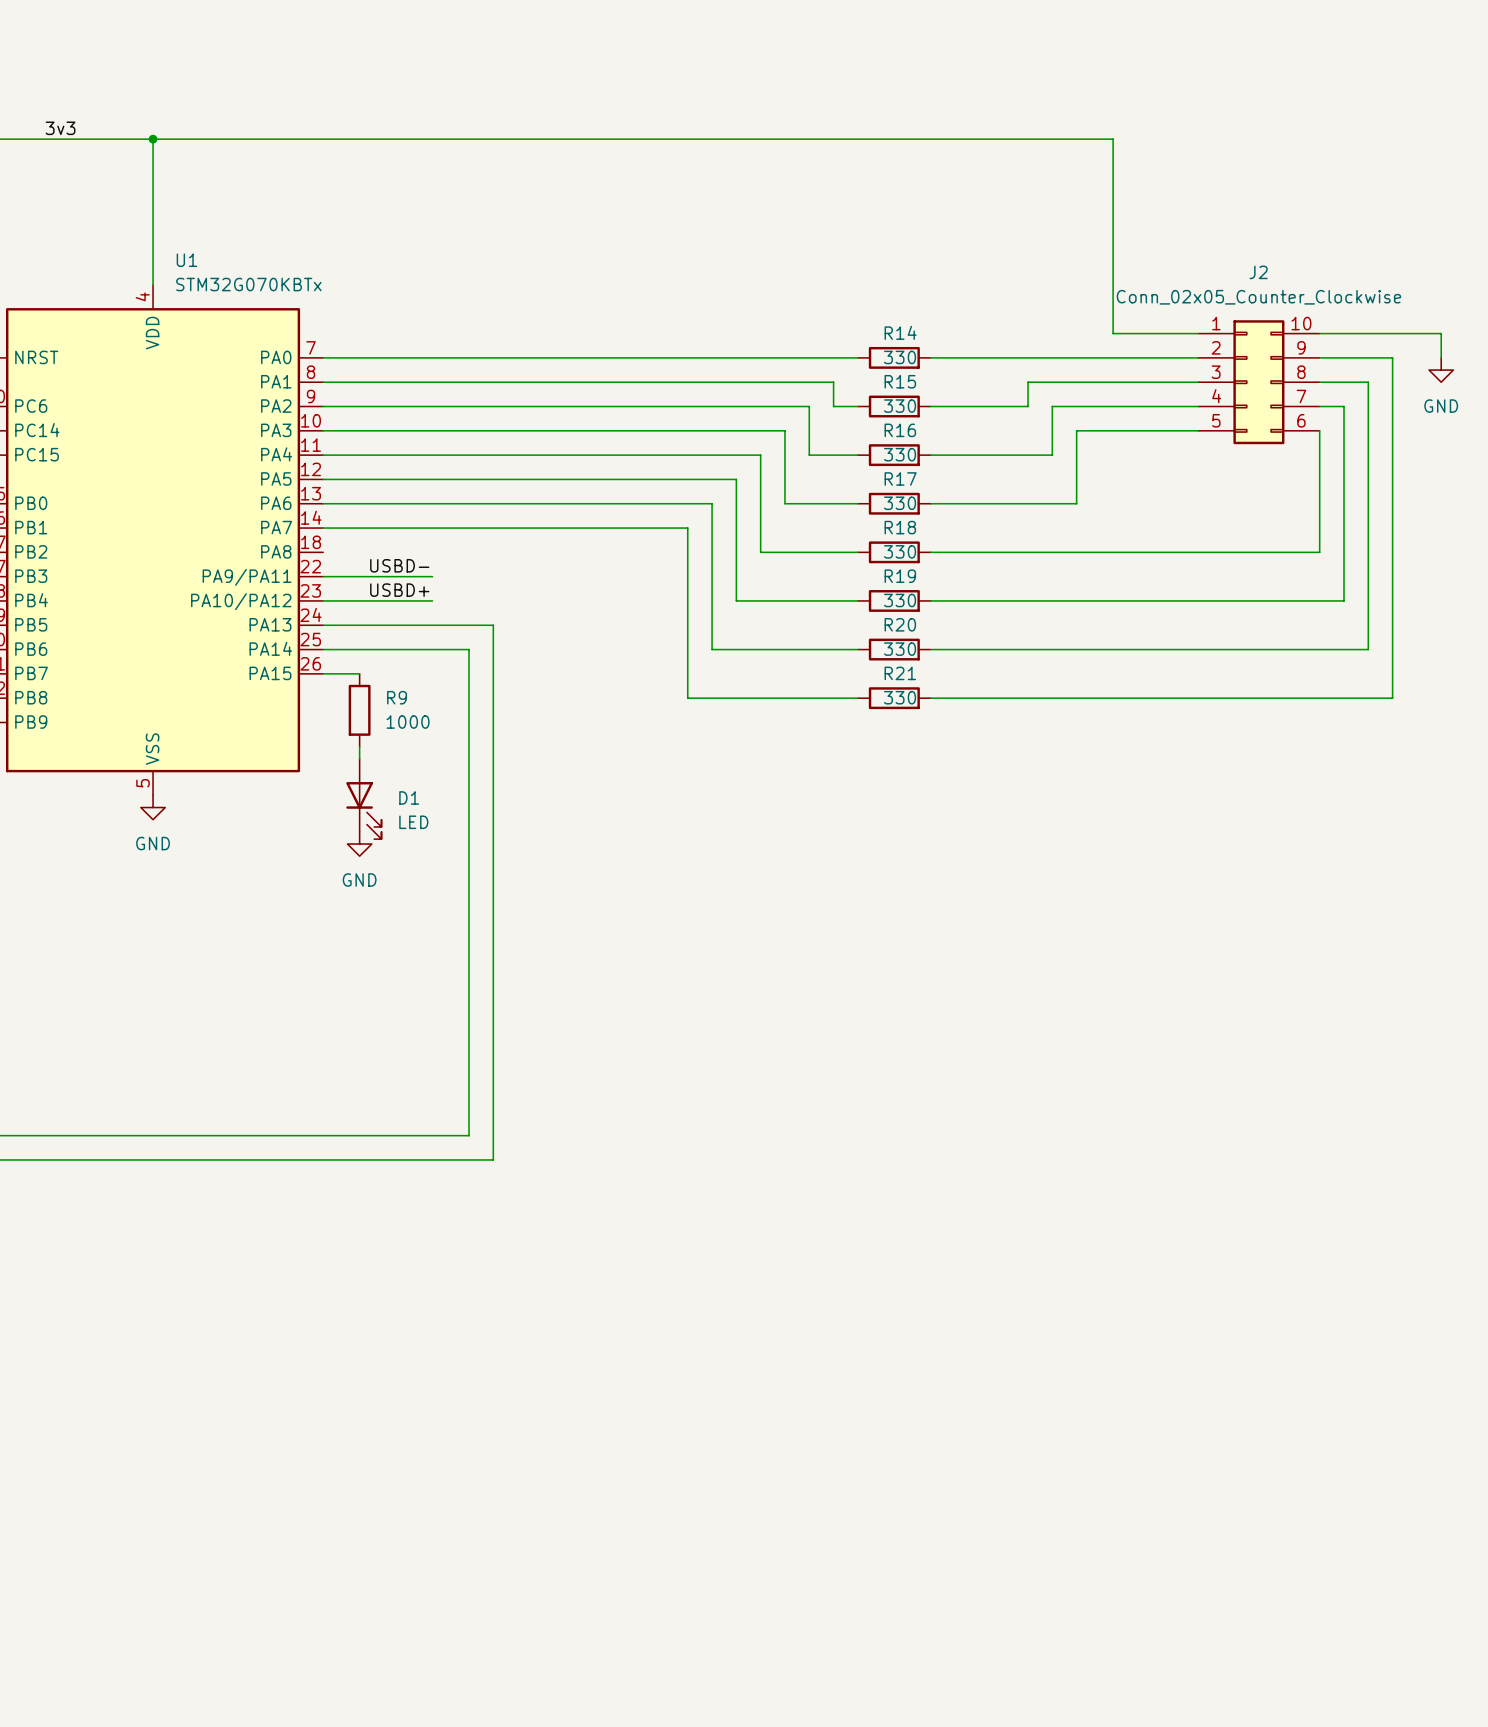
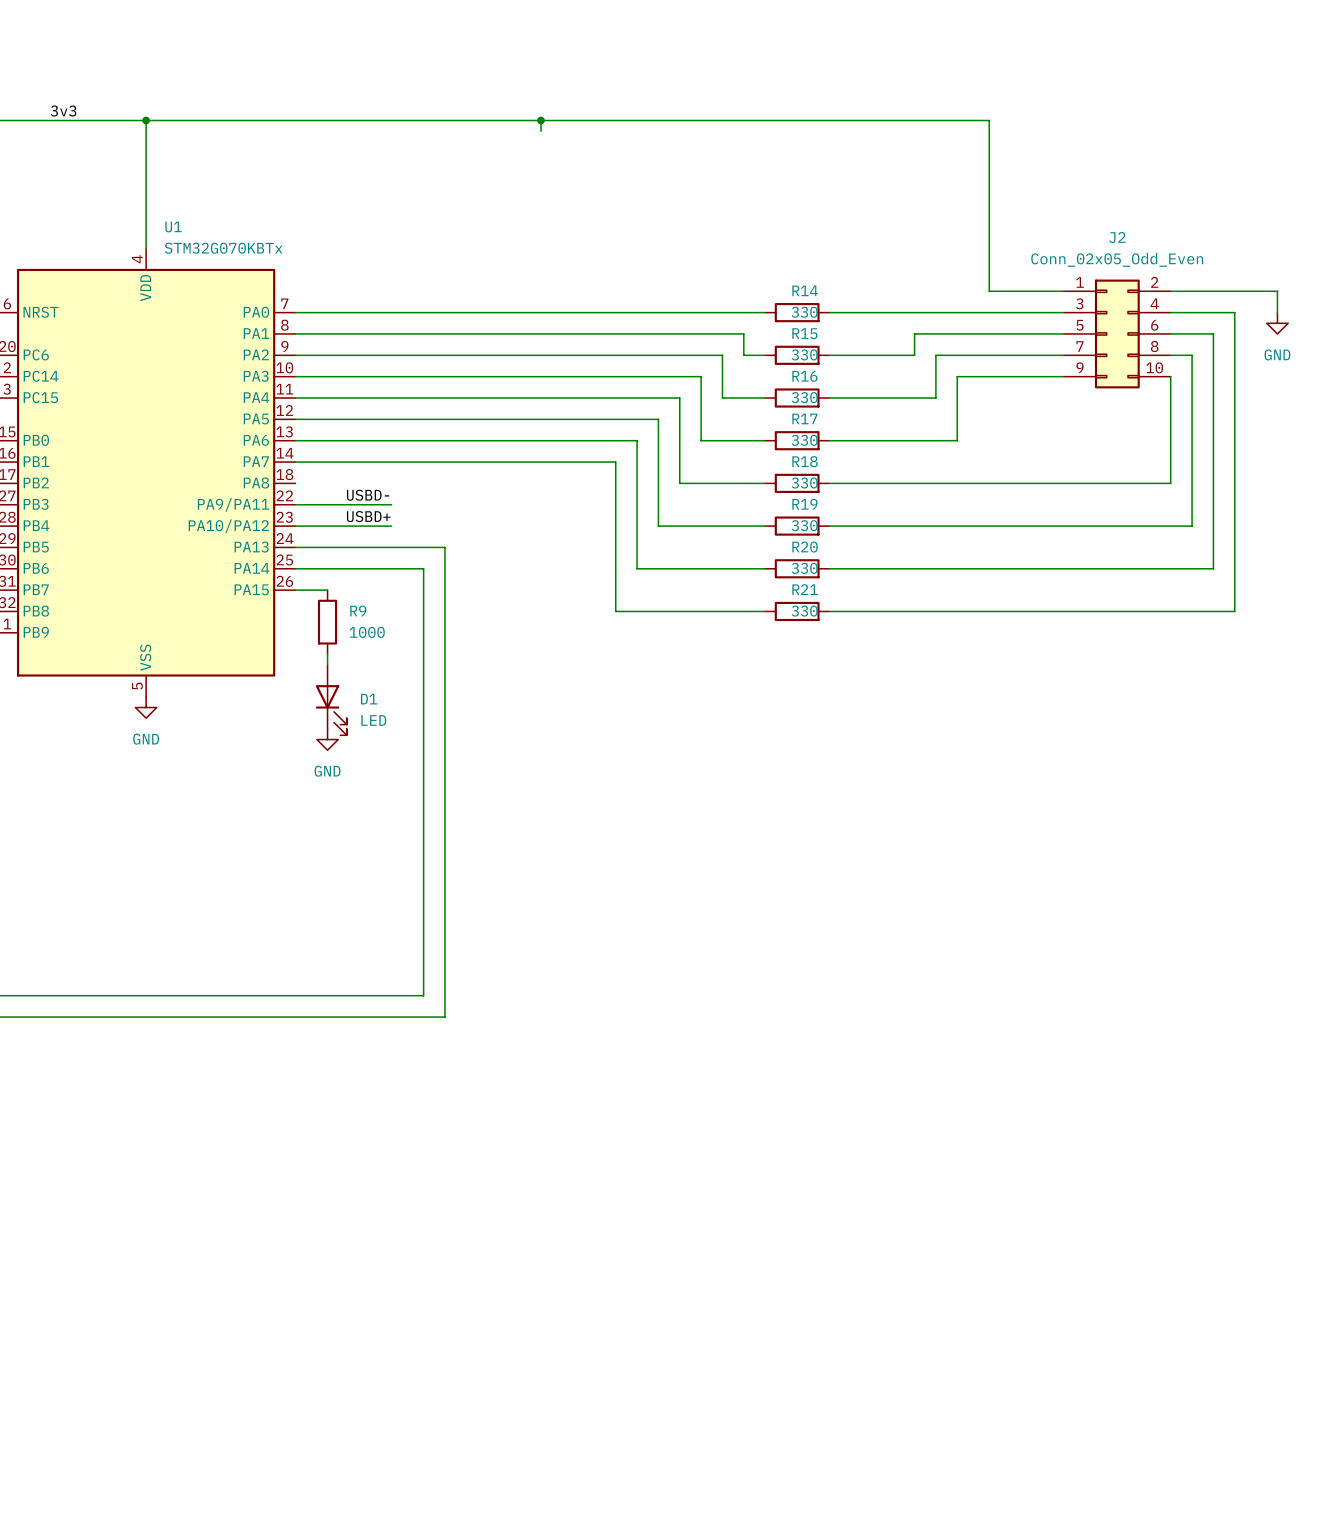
wire: none -> (541, 120) (541, 131)
junction: none -> (541, 120)
J2 value: Conn_02x05_Counter_Clockwise (1258, 297) -> Conn_02x05_Odd_Even (1117, 259)
J2 symbol: [1198, 320, 1320, 445] -> [1063, 279, 1171, 389]

